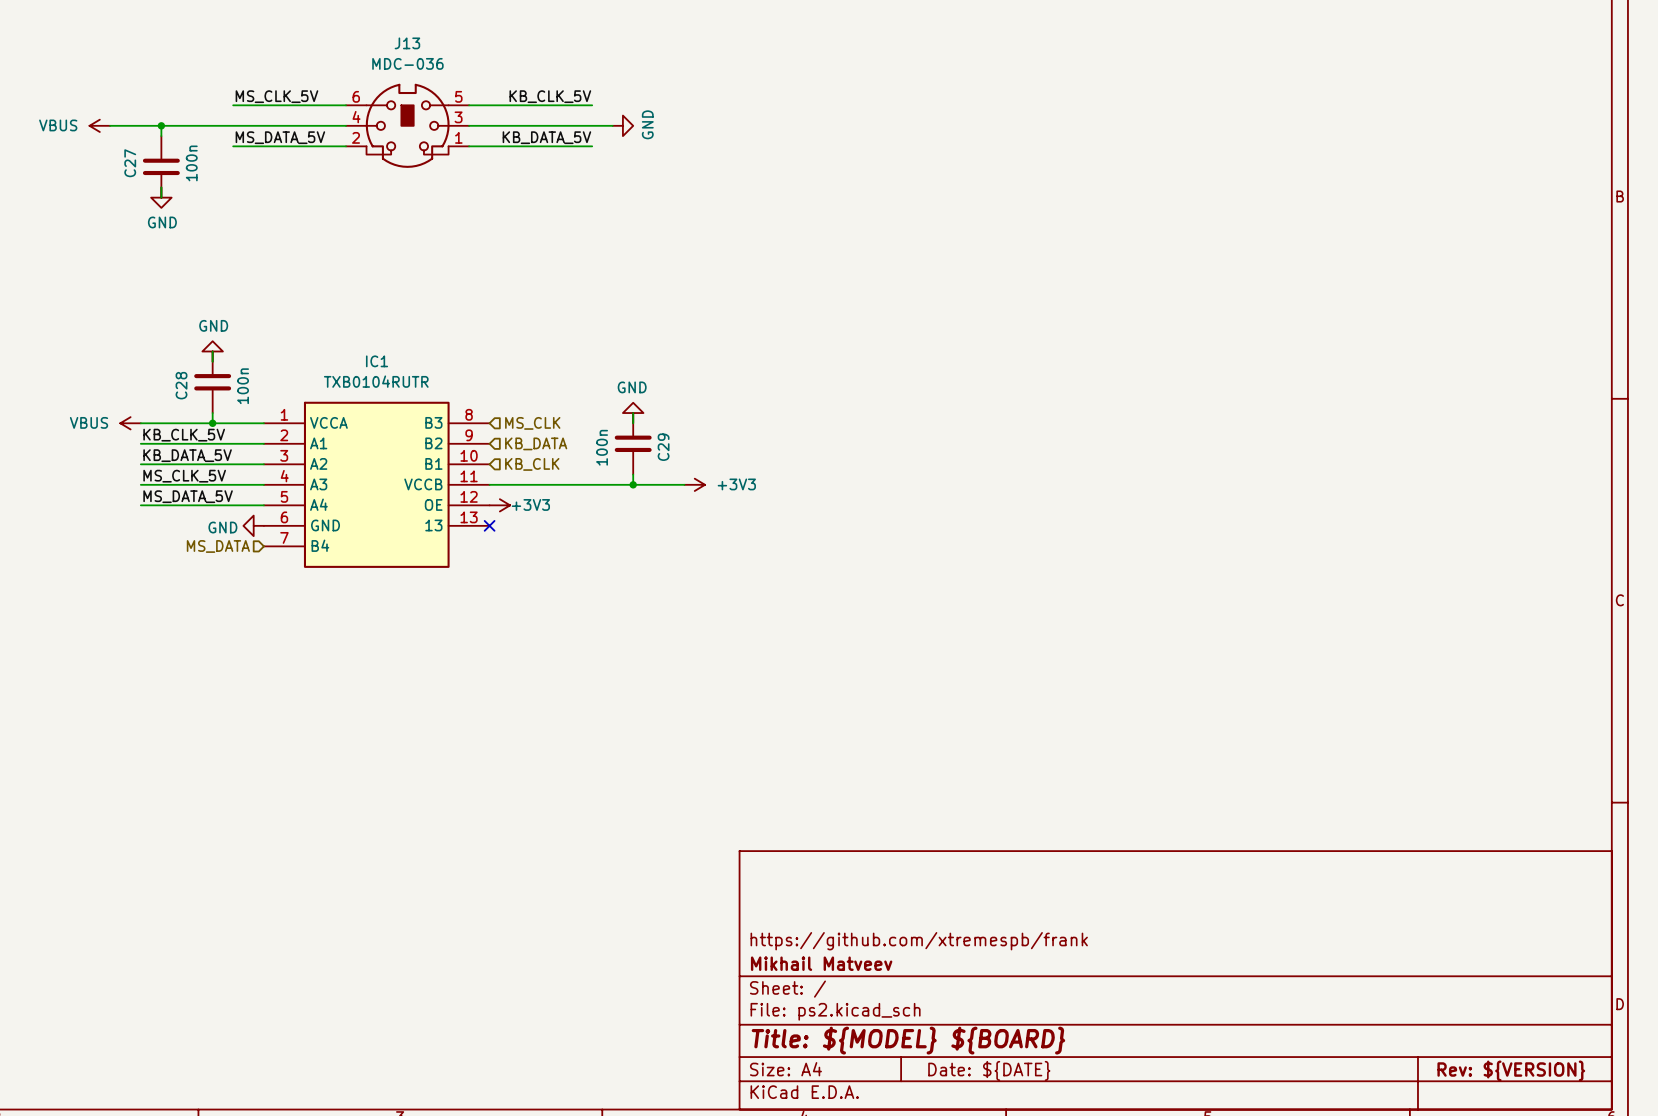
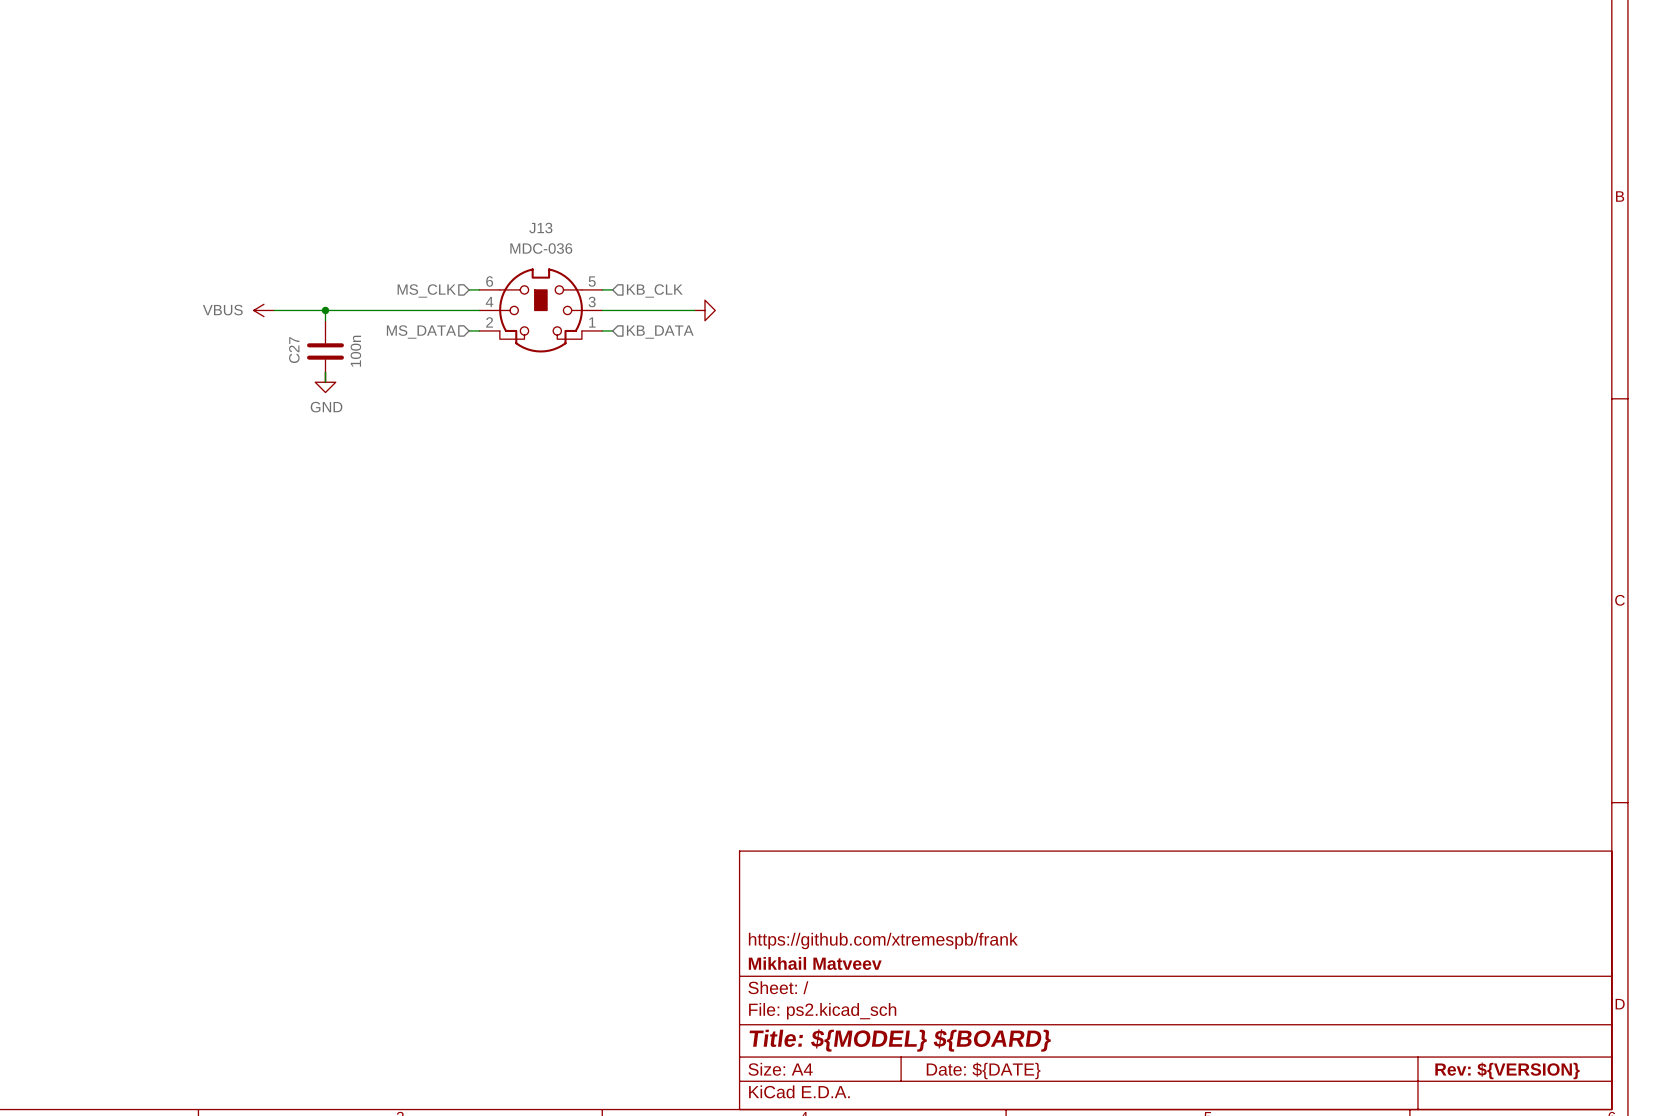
label: MS_CLK_5V (276, 96) -> none
label: KB_CLK_5V (550, 96) -> none
wire: (233, 105) (346, 105) -> none
wire: (469, 105) (592, 105) -> none
power symbol: VBUS (99, 125) -> none
wire: (110, 125) (346, 125) -> none
wire: (161, 125) (161, 136) -> none
junction: (161, 125) -> none
J13 position: (407, 125) -> (540, 310)
wire: (469, 125) (612, 125) -> none
power symbol: GND (622, 125) -> none
label: MS_DATA_5V (280, 137) -> none
label: KB_DATA_5V (546, 137) -> none
wire: (233, 146) (346, 146) -> none
wire: (469, 146) (592, 146) -> none
C27 position: (161, 166) -> (325, 351)
wire: (161, 187) (161, 197) -> none
power symbol: GND (161, 197) -> none
wire: none -> (469, 289) (479, 289)
wire: none -> (602, 289) (612, 289)
hierarchical label: none -> KB_CLK (654, 290)
power symbol: none -> VBUS (263, 310)
wire: none -> (274, 310) (479, 310)
junction: none -> (325, 310)
wire: none -> (602, 310) (694, 310)
power symbol: none -> (705, 310)
wire: none -> (469, 330) (479, 330)
wire: none -> (602, 330) (612, 330)
hierarchical label: none -> MS_DATA (421, 331)
wire: (212, 351) (212, 361) -> (325, 310) (325, 320)
power symbol: GND (212, 351) -> none
C28: 100n (212, 382) -> none
power symbol: none -> GND (325, 382)
wire: (212, 413) (212, 423) -> (325, 372) (325, 382)
wire: (633, 413) (633, 423) -> none
power symbol: GND (633, 413) -> none
power symbol: VBUS (130, 423) -> none
wire: (140, 423) (263, 423) -> none
junction: (212, 423) -> none
hierarchical label rotation: 0° (532, 423) -> 180° (426, 290)
hierarchical label position: MS_CLK (532, 423) -> MS_CLK (426, 290)
label: KB_CLK_5V (184, 435) -> none
wire: (140, 443) (263, 443) -> none
hierarchical label position: KB_DATA (536, 443) -> KB_DATA (660, 332)
C29: 100n (633, 443) -> none
label: KB_DATA_5V (187, 455) -> none
wire: (140, 464) (263, 464) -> none
hierarchical label: KB_CLK (532, 464) -> none
wire: (633, 474) (633, 484) -> none
label: MS_CLK_5V (184, 476) -> none
wire: (140, 484) (263, 484) -> none
IC1: TXB0104RUTR (376, 484) -> none
wire: (489, 484) (684, 484) -> none
junction: (633, 484) -> none
power symbol: +3V3 (694, 484) -> none
label: MS_DATA_5V (188, 496) -> none
wire: (140, 505) (263, 505) -> none
power symbol: +3V3 (499, 505) -> none
power symbol: GND (253, 525) -> none
no-connect mark: (489, 525) -> none
hierarchical label: MS_DATA (218, 546) -> none

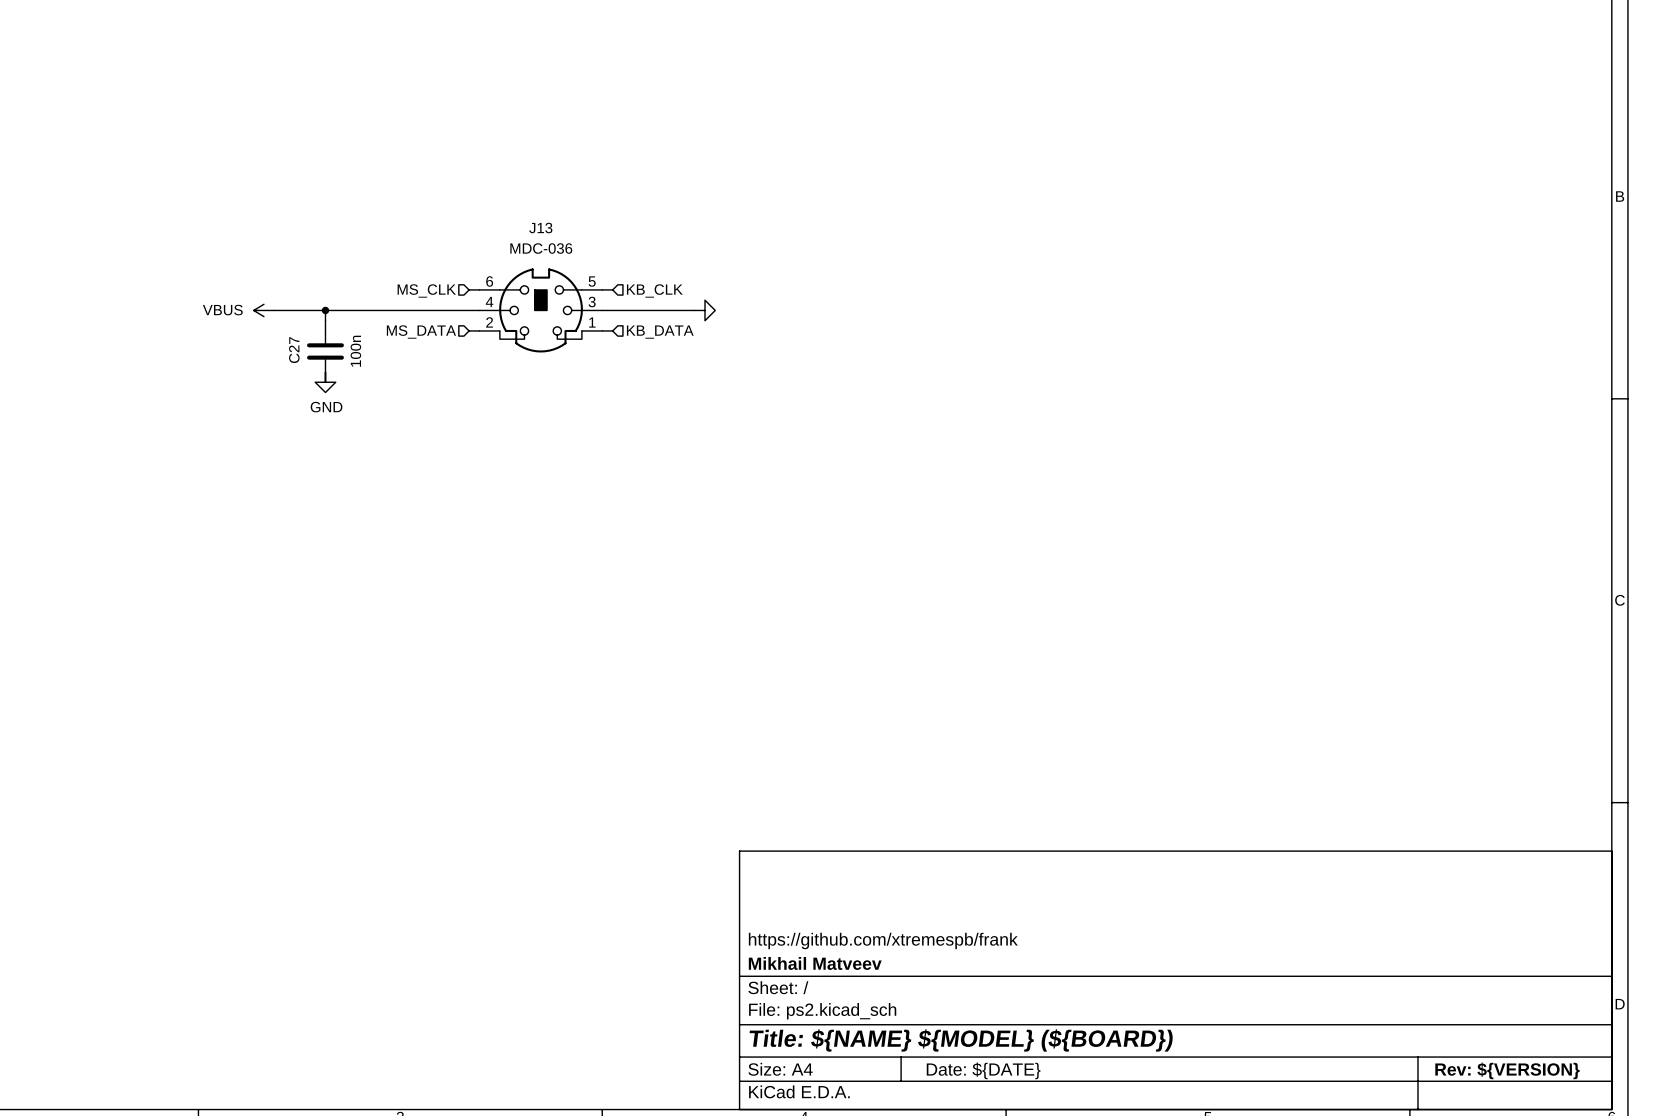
title block: Title: ${MODEL} ${BOARD} (900, 1040) -> Title: ${NAME} ${MODEL} (${BOARD}) (961, 1040)

